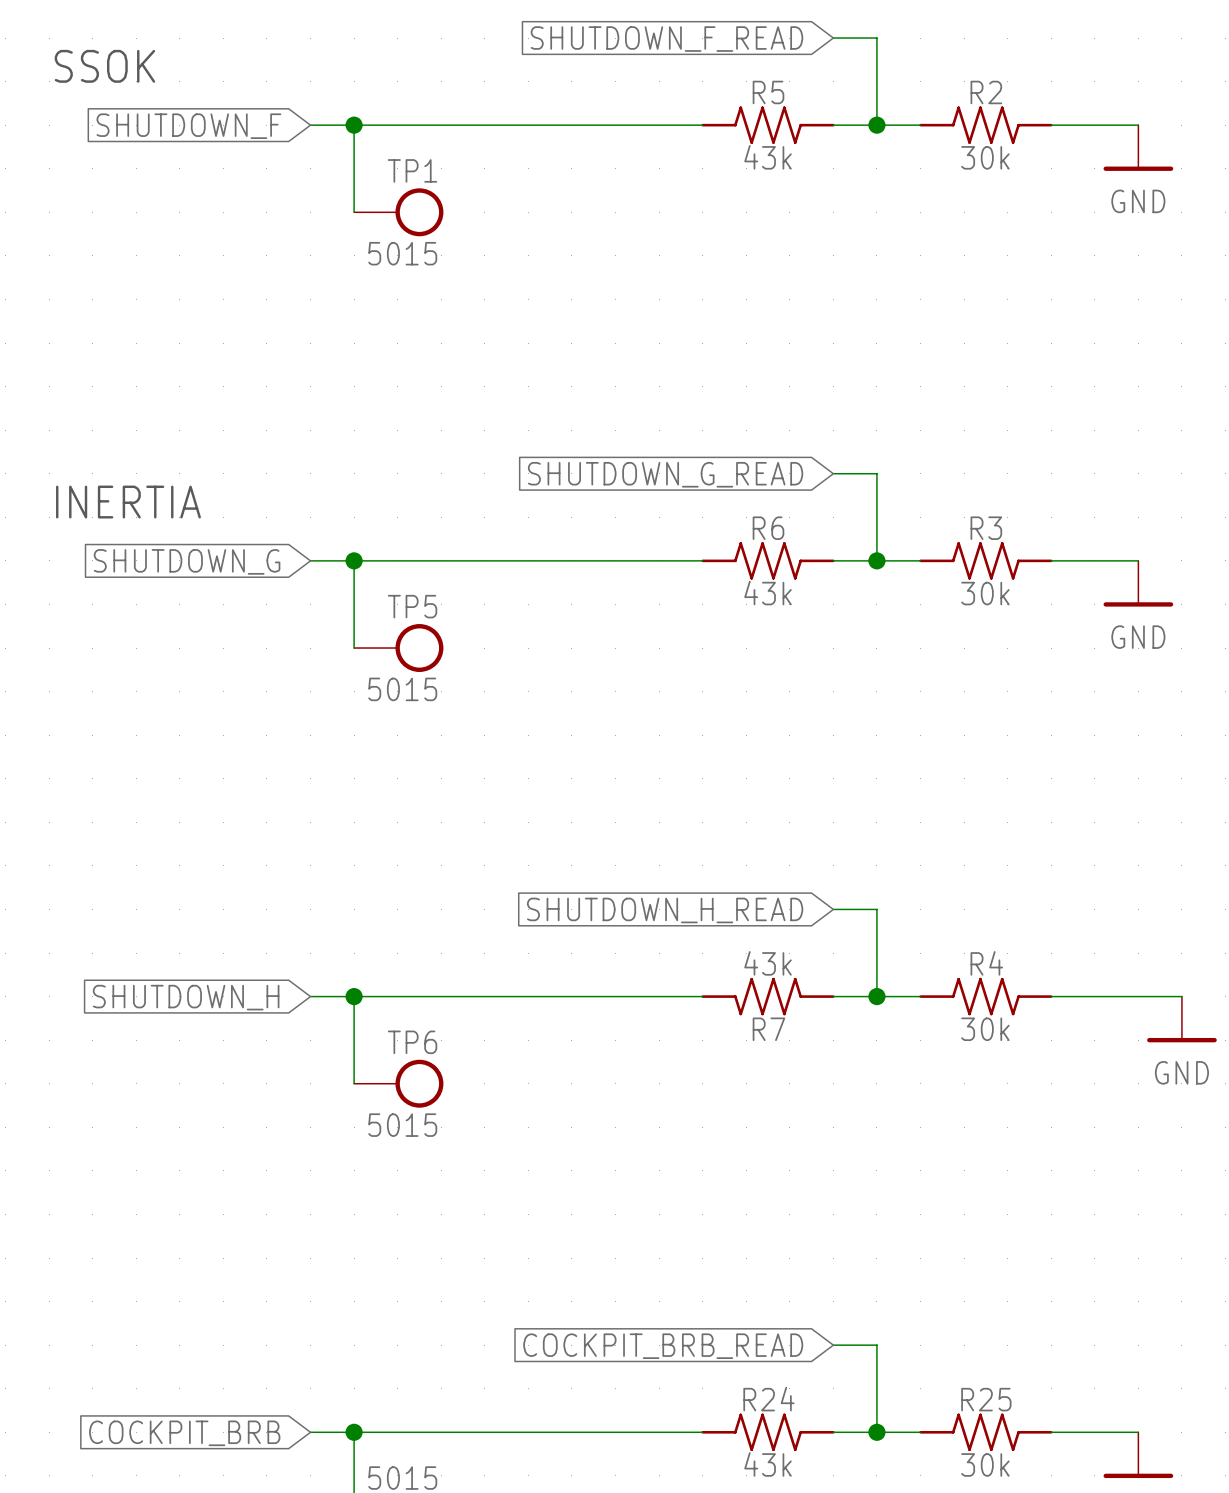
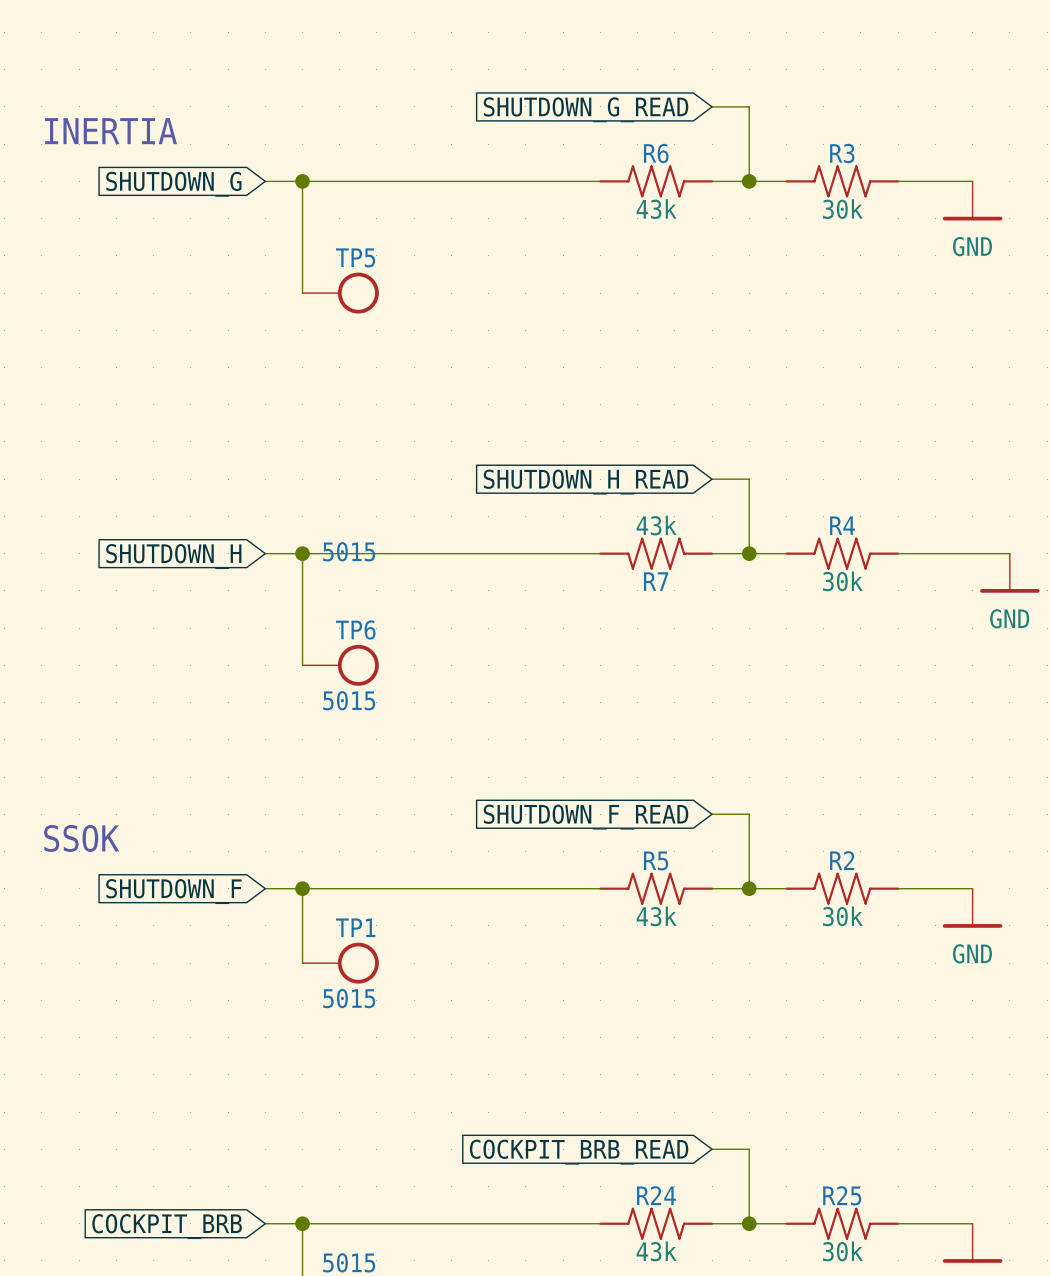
wire: (833, 38) (876, 38) (876, 125) (920, 125) -> none
global label: SHUTDOWN_F_READ (666, 39) -> none
text: SSOK (104, 66) -> none
wire: (310, 125) (702, 125) -> none
wire: (354, 125) (354, 212) -> (302, 293) (302, 181)
junction position: (354, 125) -> (302, 181)
R5 position: (768, 125) -> (656, 888)
wire: none -> (749, 106) (749, 181)
junction position: (876, 125) -> (749, 181)
R2 position: (985, 125) -> (842, 888)
wire: (1051, 125) (1138, 125) -> (712, 181) (786, 181)
global label: SHUTDOWN_F (188, 126) -> none
power symbol position: GND (1138, 148) -> GND (972, 200)
TP1 position: (398, 212) -> (340, 963)
wire: (833, 473) (876, 473) (876, 560) (920, 560) -> none
global label position: SHUTDOWN_G_READ (665, 474) -> SHUTDOWN_G_READ (586, 109)
text position: INERTIA (128, 502) -> INERTIA (111, 131)
wire: (310, 560) (702, 560) -> (265, 181) (600, 181)
wire: (354, 560) (354, 648) -> (302, 665) (302, 553)
junction position: (354, 560) -> (302, 553)
R6 position: (768, 560) -> (656, 181)
wire: none -> (749, 479) (749, 553)
junction position: (876, 560) -> (749, 553)
R3 position: (985, 560) -> (842, 181)
wire: (1051, 560) (1138, 560) -> (898, 181) (972, 181)
global label position: SHUTDOWN_G (187, 561) -> SHUTDOWN_G (173, 184)
power symbol position: GND (1138, 583) -> GND (1009, 573)
TP5 position: (398, 648) -> (340, 293)
TP5 text position: 5015 (402, 689) -> 5015 (349, 551)
wire: (833, 909) (876, 909) (876, 953) -> (712, 814) (749, 814)
global label position: SHUTDOWN_H_READ (665, 910) -> SHUTDOWN_H_READ (586, 482)
global label: none -> SHUTDOWN_F_READ (586, 817)
text: none -> SSOK (81, 838)
wire: (310, 996) (702, 996) -> (265, 553) (600, 553)
wire: (354, 996) (354, 1040) -> (302, 925) (302, 963)
junction position: (354, 996) -> (302, 888)
R7 position: (768, 996) -> (656, 553)
wire: (833, 996) (920, 996) -> (712, 553) (786, 553)
wire: none -> (749, 851) (749, 888)
junction position: (876, 996) -> (749, 888)
R4 position: (985, 996) -> (842, 553)
wire: (1051, 996) (1181, 996) -> (898, 553) (1009, 553)
global label position: SHUTDOWN_H (186, 997) -> SHUTDOWN_H (173, 556)
power symbol position: GND (1181, 1019) -> GND (972, 908)
wire: none -> (265, 888) (600, 888)
wire: none -> (712, 888) (786, 888)
wire: none -> (898, 888) (972, 888)
global label: none -> SHUTDOWN_F (173, 891)
TP6 position: (398, 1083) -> (340, 665)

